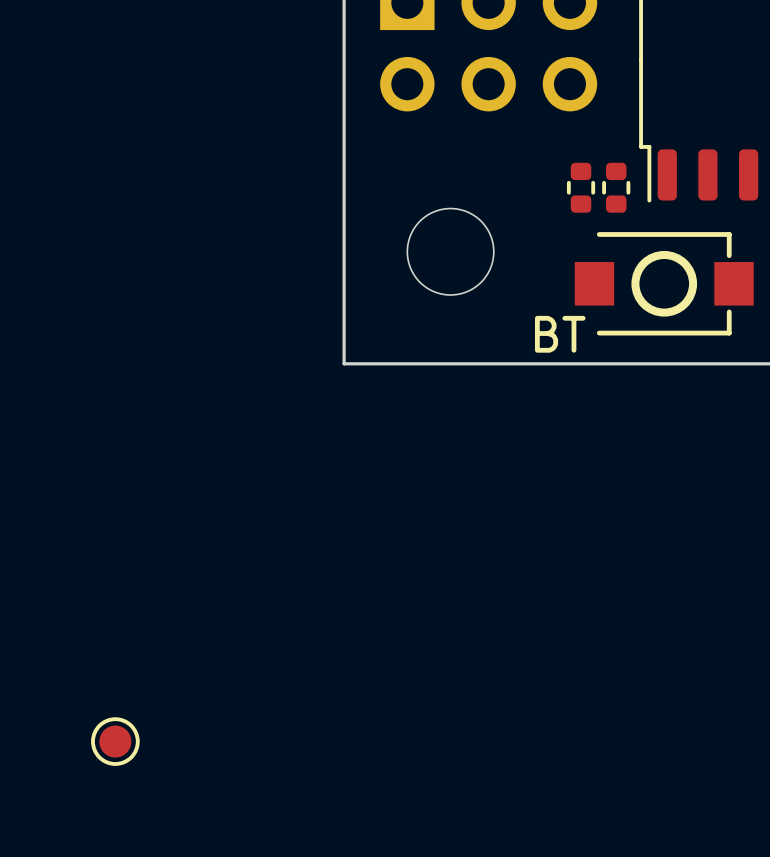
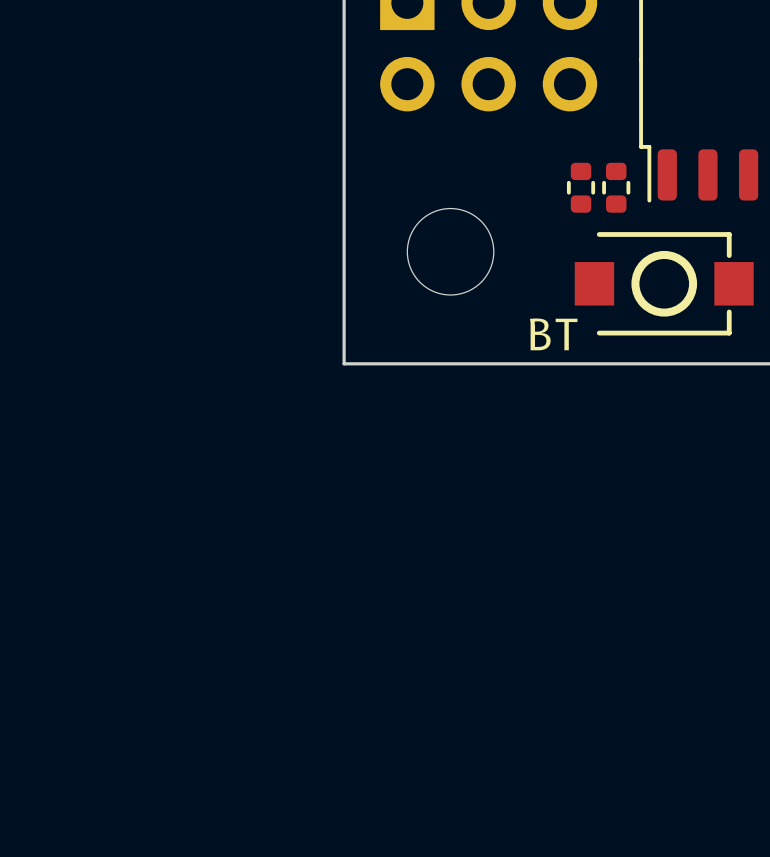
part: (115, 741) -> none

